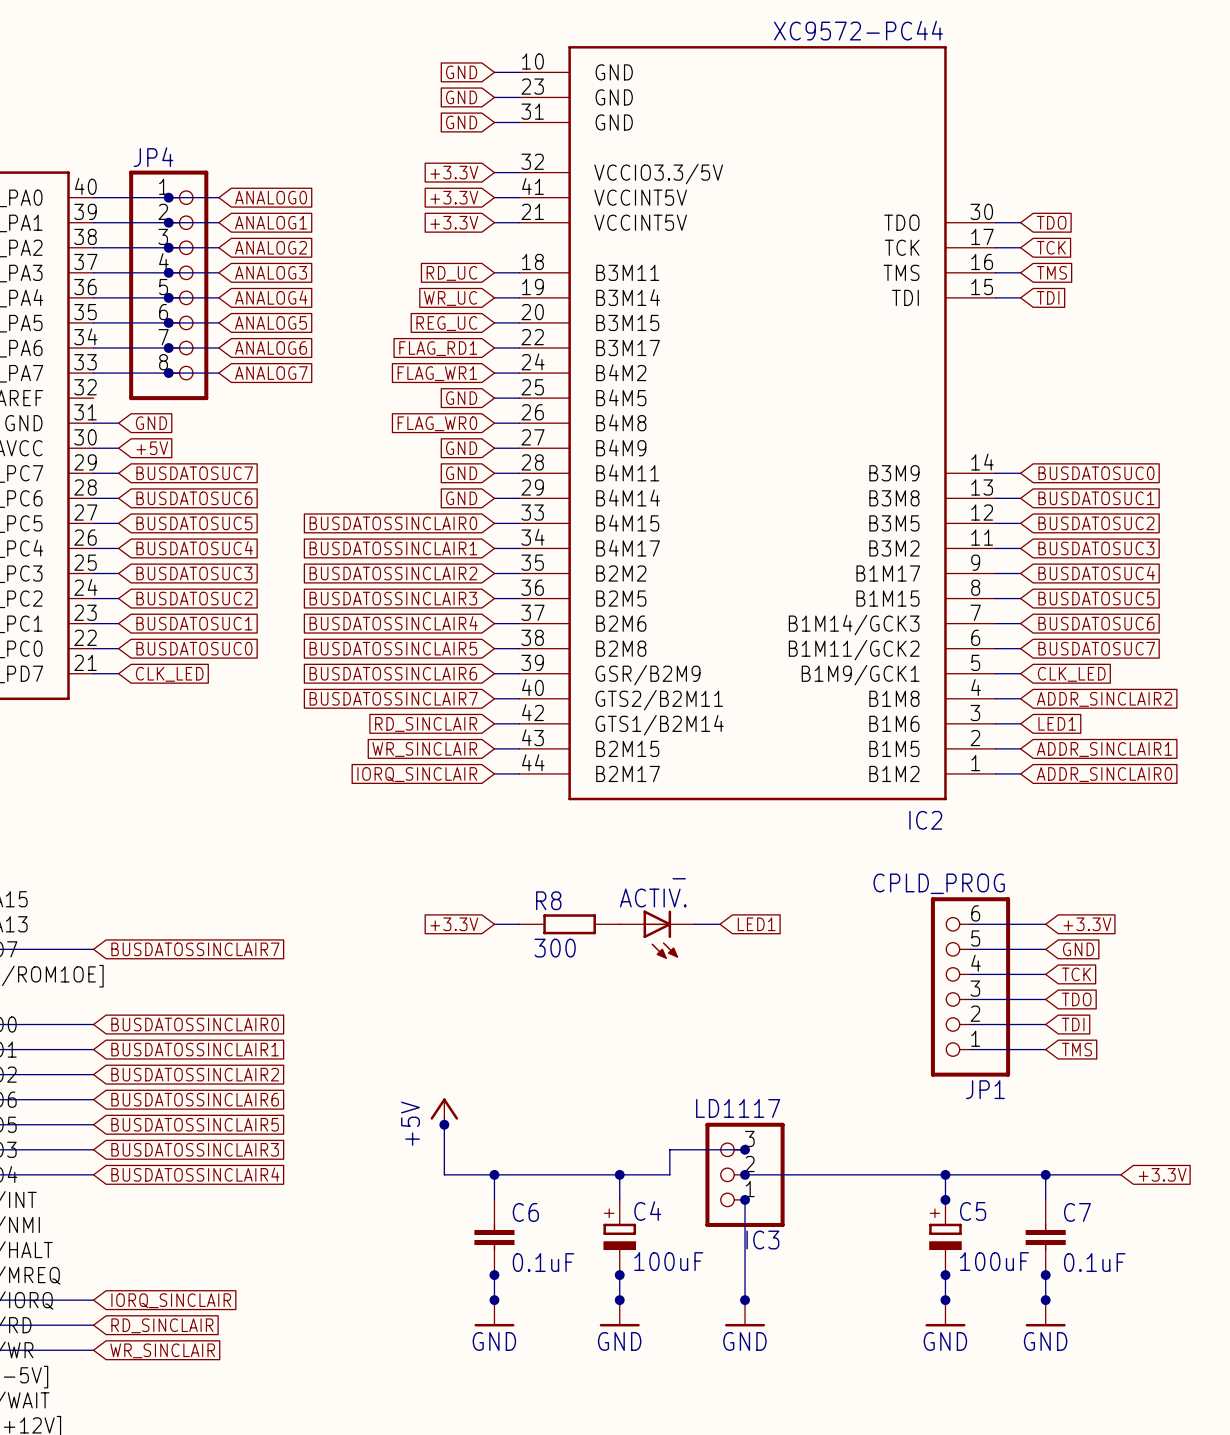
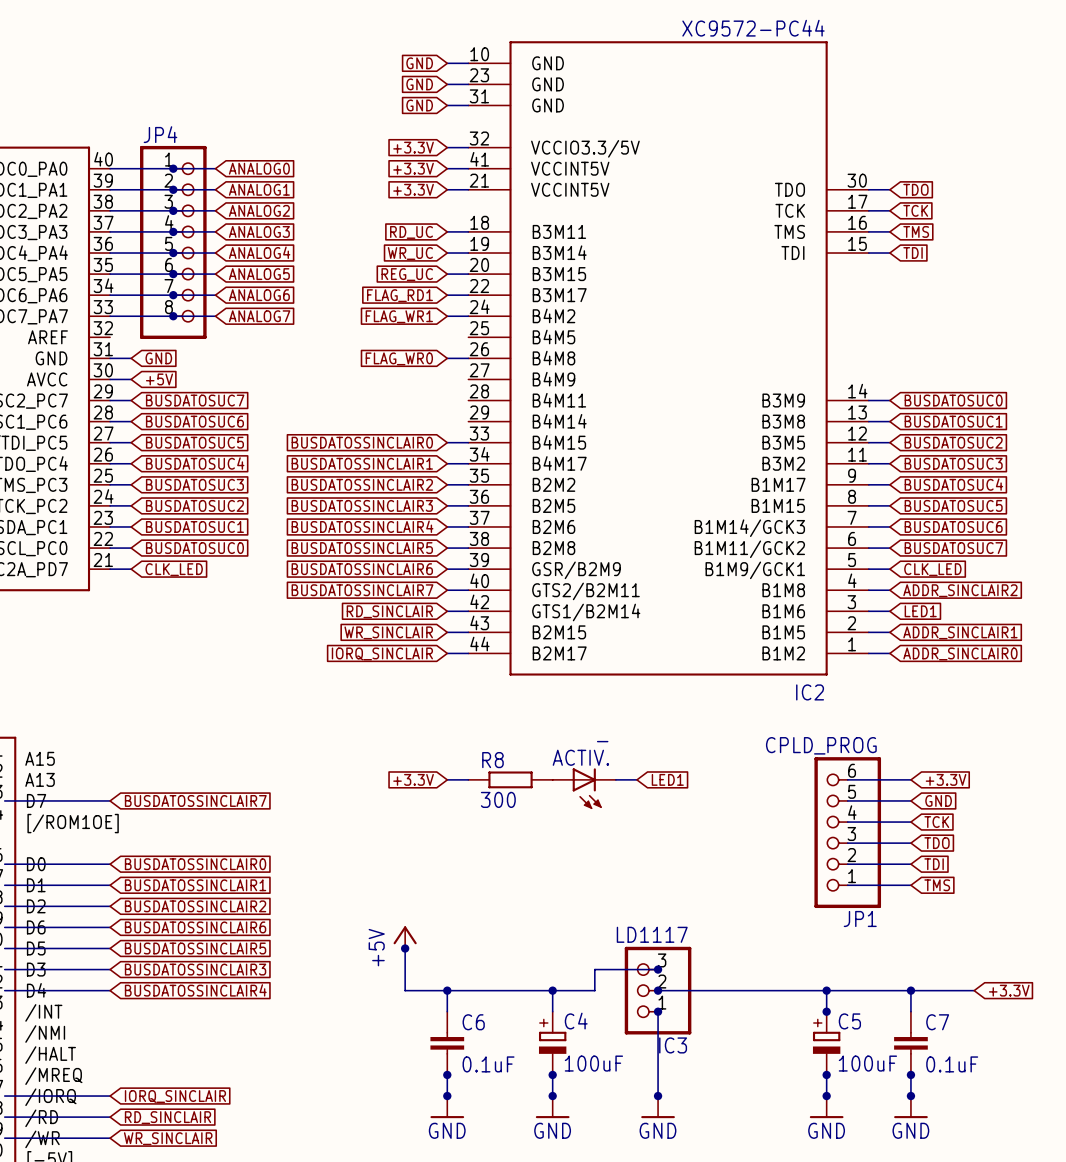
global label: GND (461, 398) -> none
wire: (494, 398) (519, 398) -> none
global label: GND (461, 448) -> none
wire: (494, 448) (519, 448) -> none
global label: GND (461, 473) -> none
wire: (494, 473) (519, 473) -> none
global label: GND (461, 498) -> none
wire: (494, 498) (519, 498) -> none

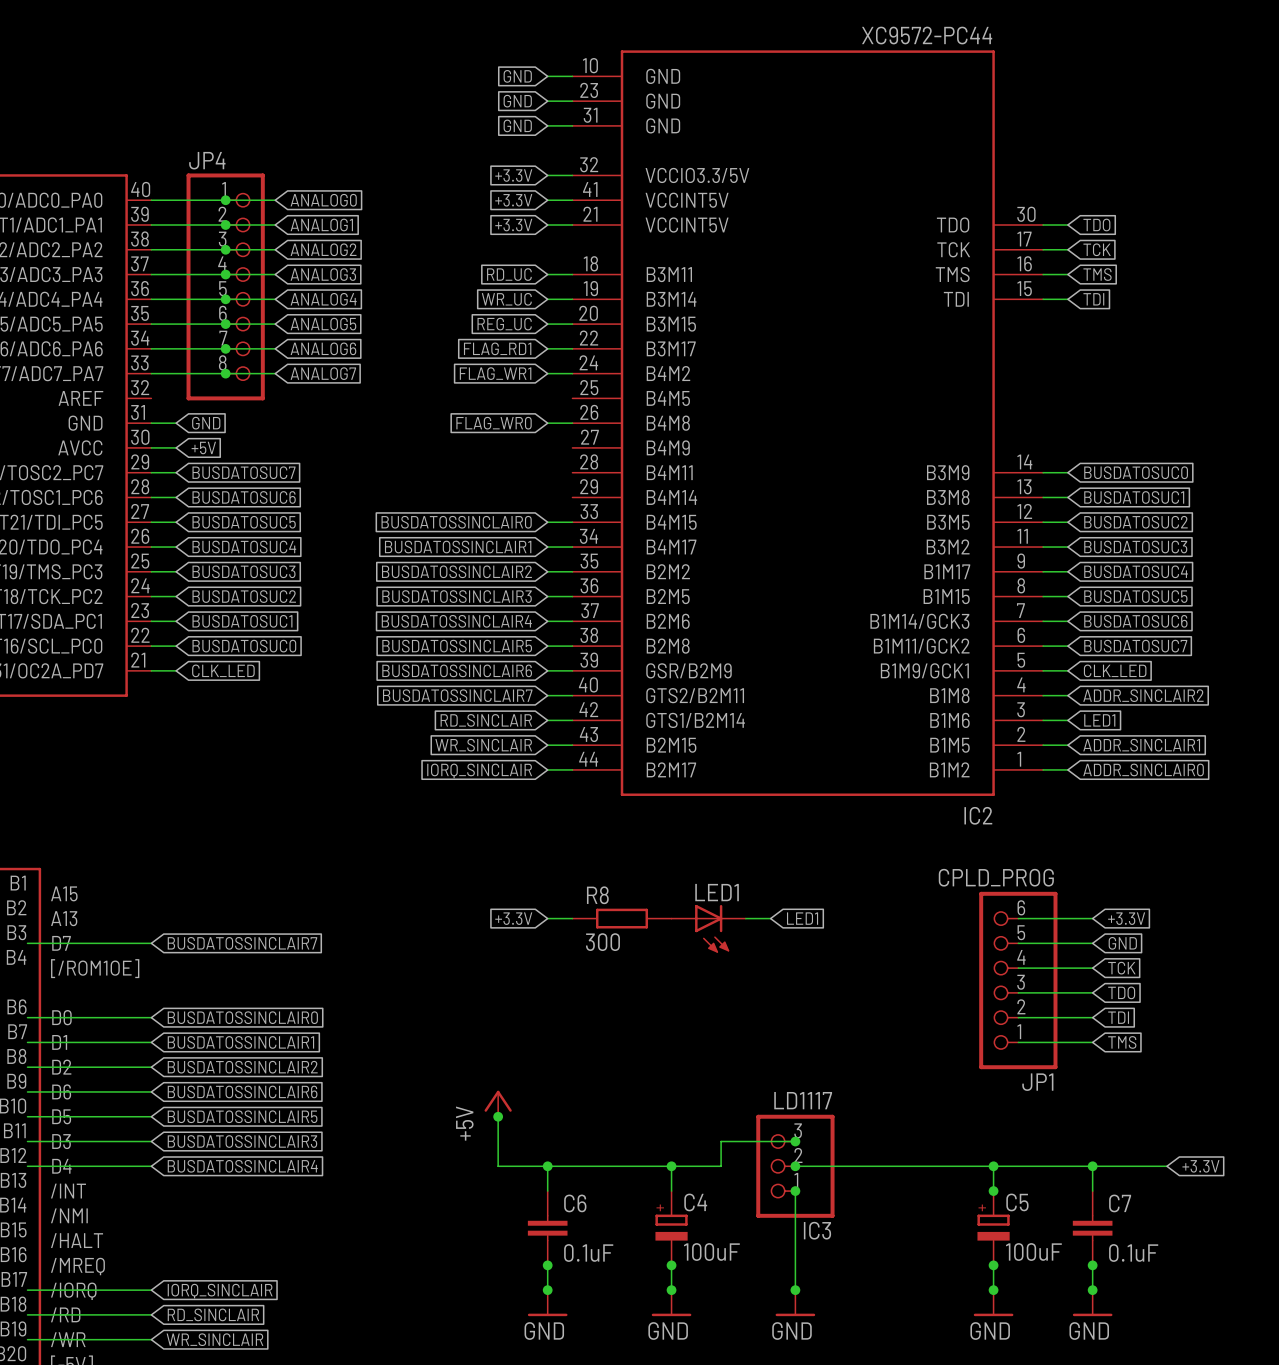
ACTIV. value: - (602, 741) -> none
ACTIV. name: ACTIV. (580, 757) -> LED1 (717, 892)

